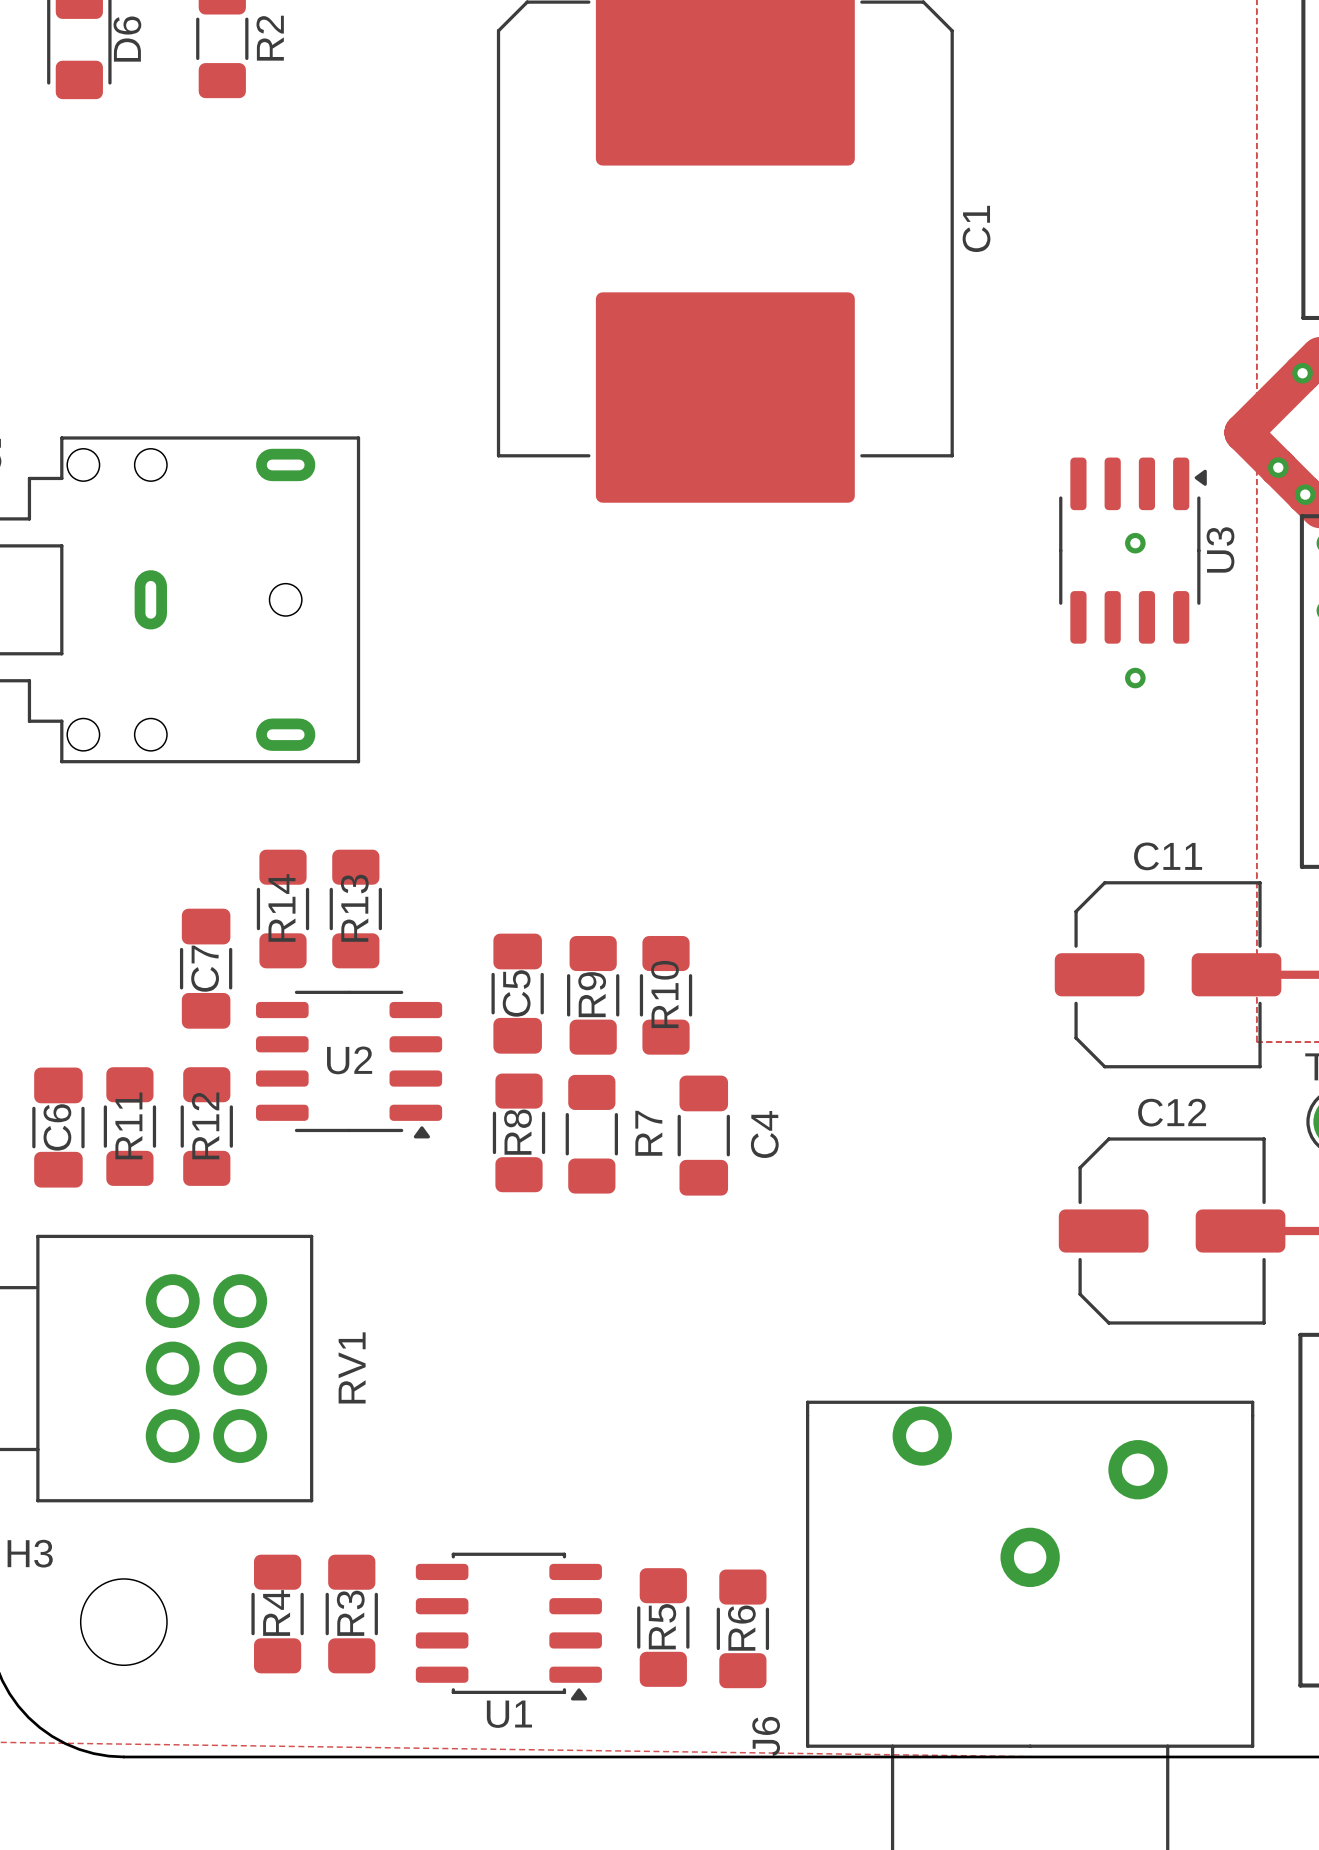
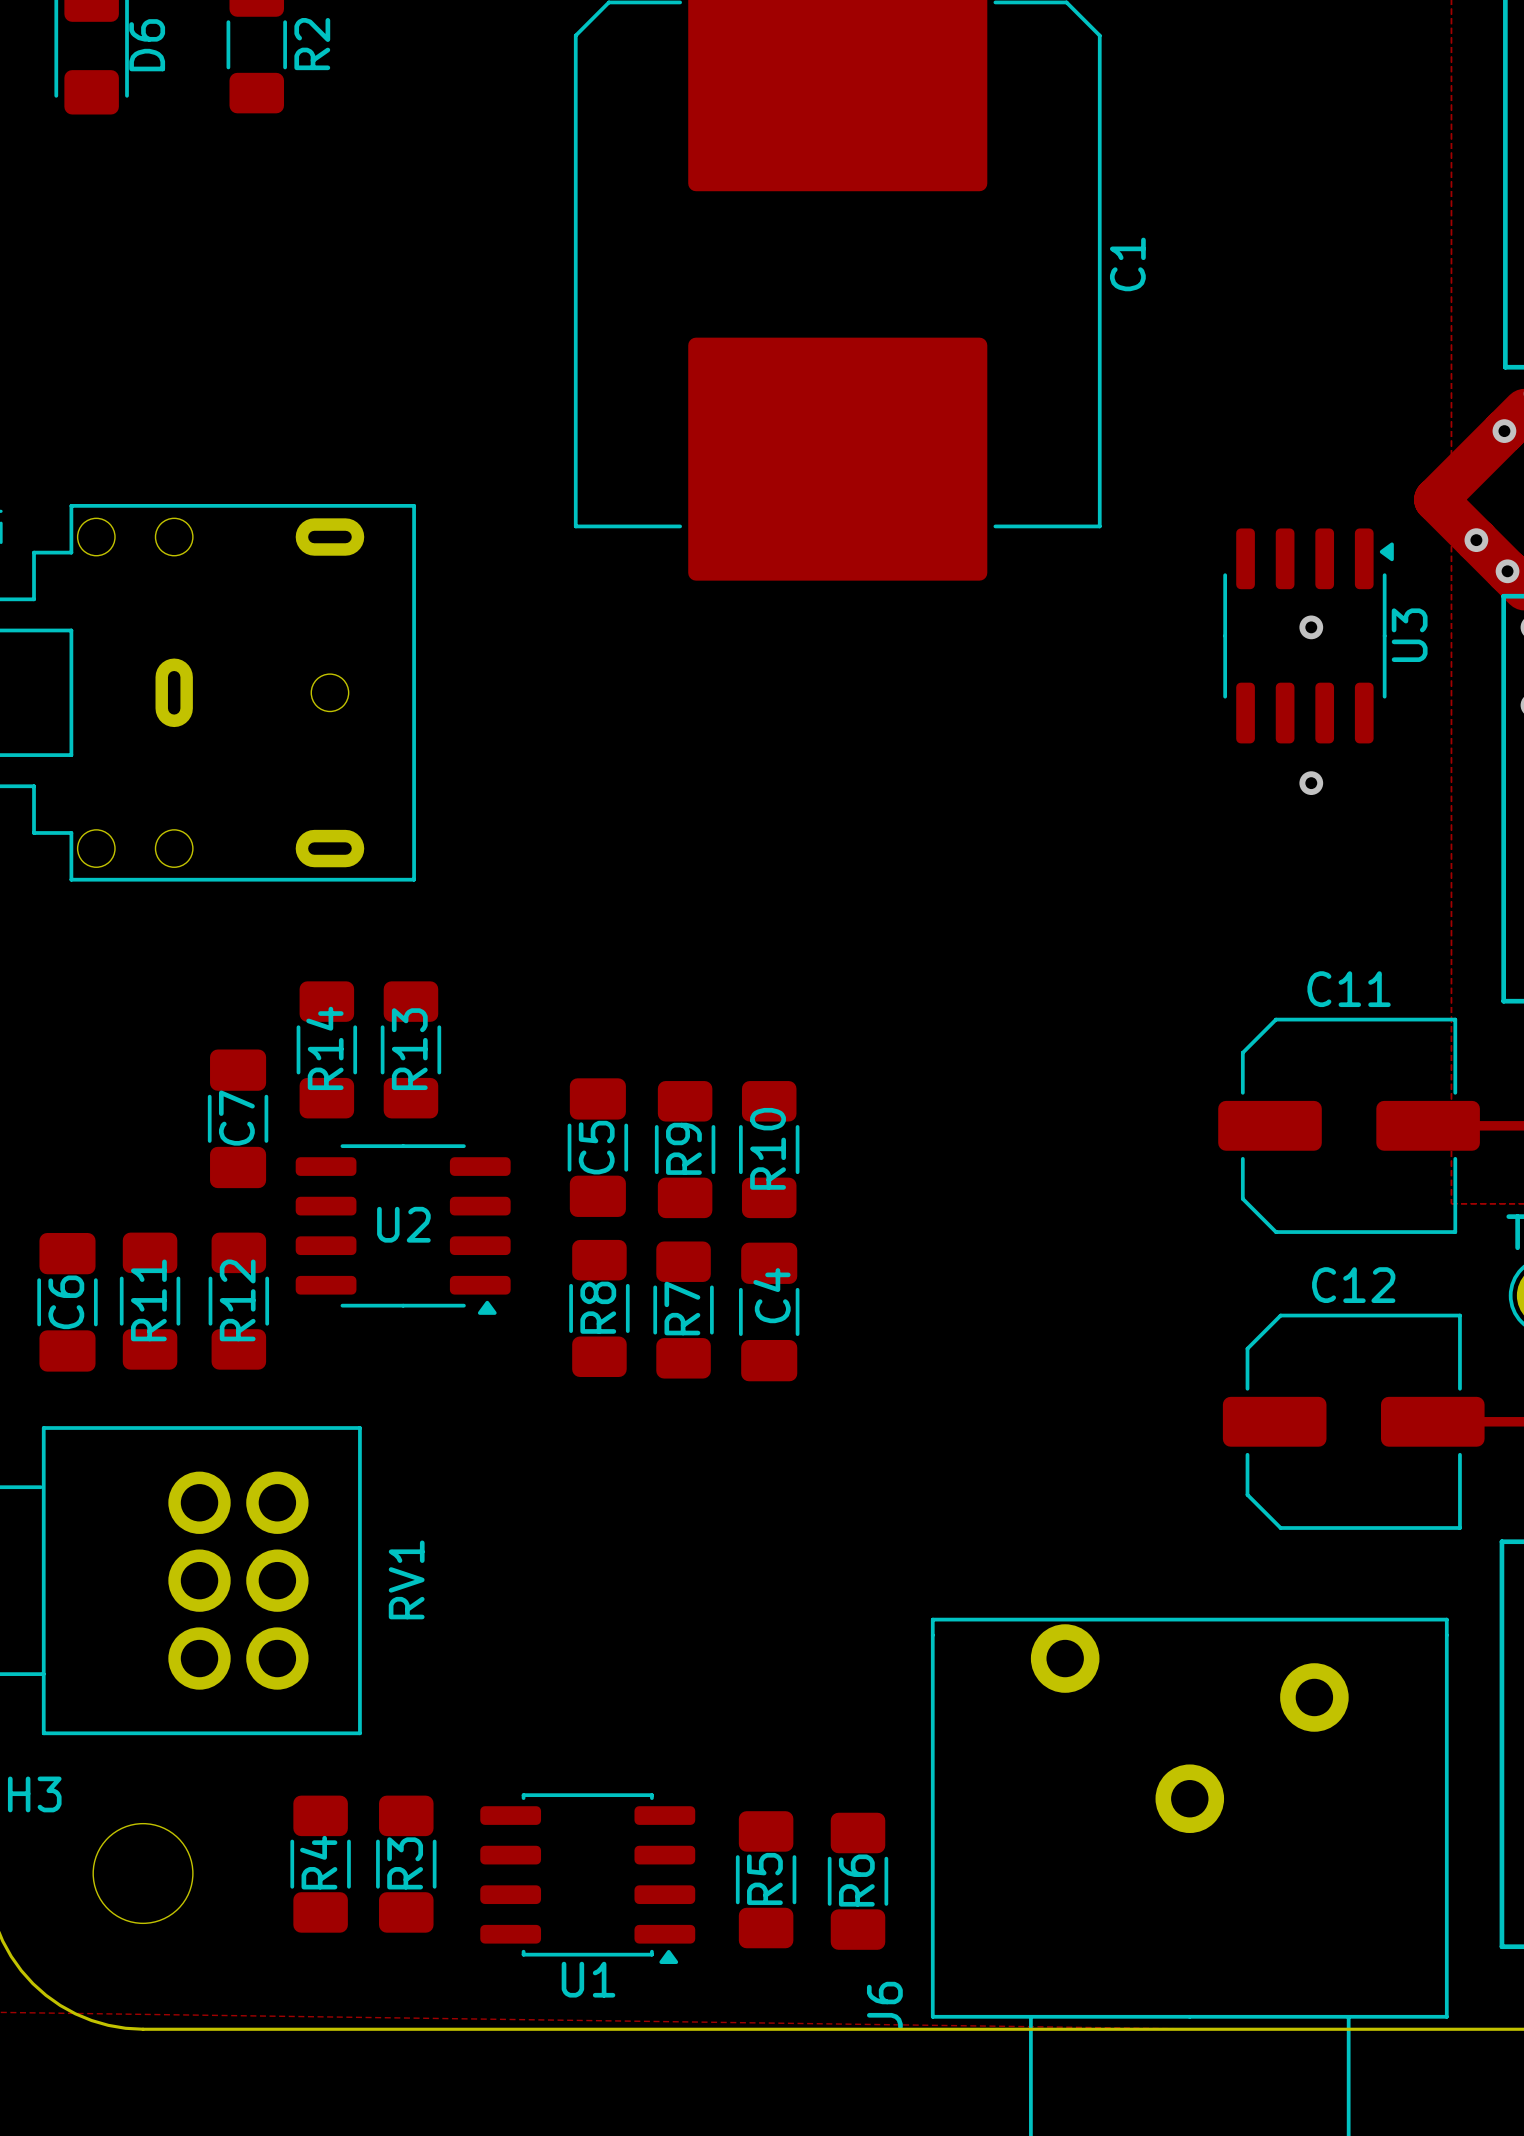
R7 name position: R7 (648, 1133) -> R7 (682, 1308)
C4 name position: C4 (764, 1134) -> C4 (771, 1295)
C4 position: (703, 1135) -> (769, 1311)

